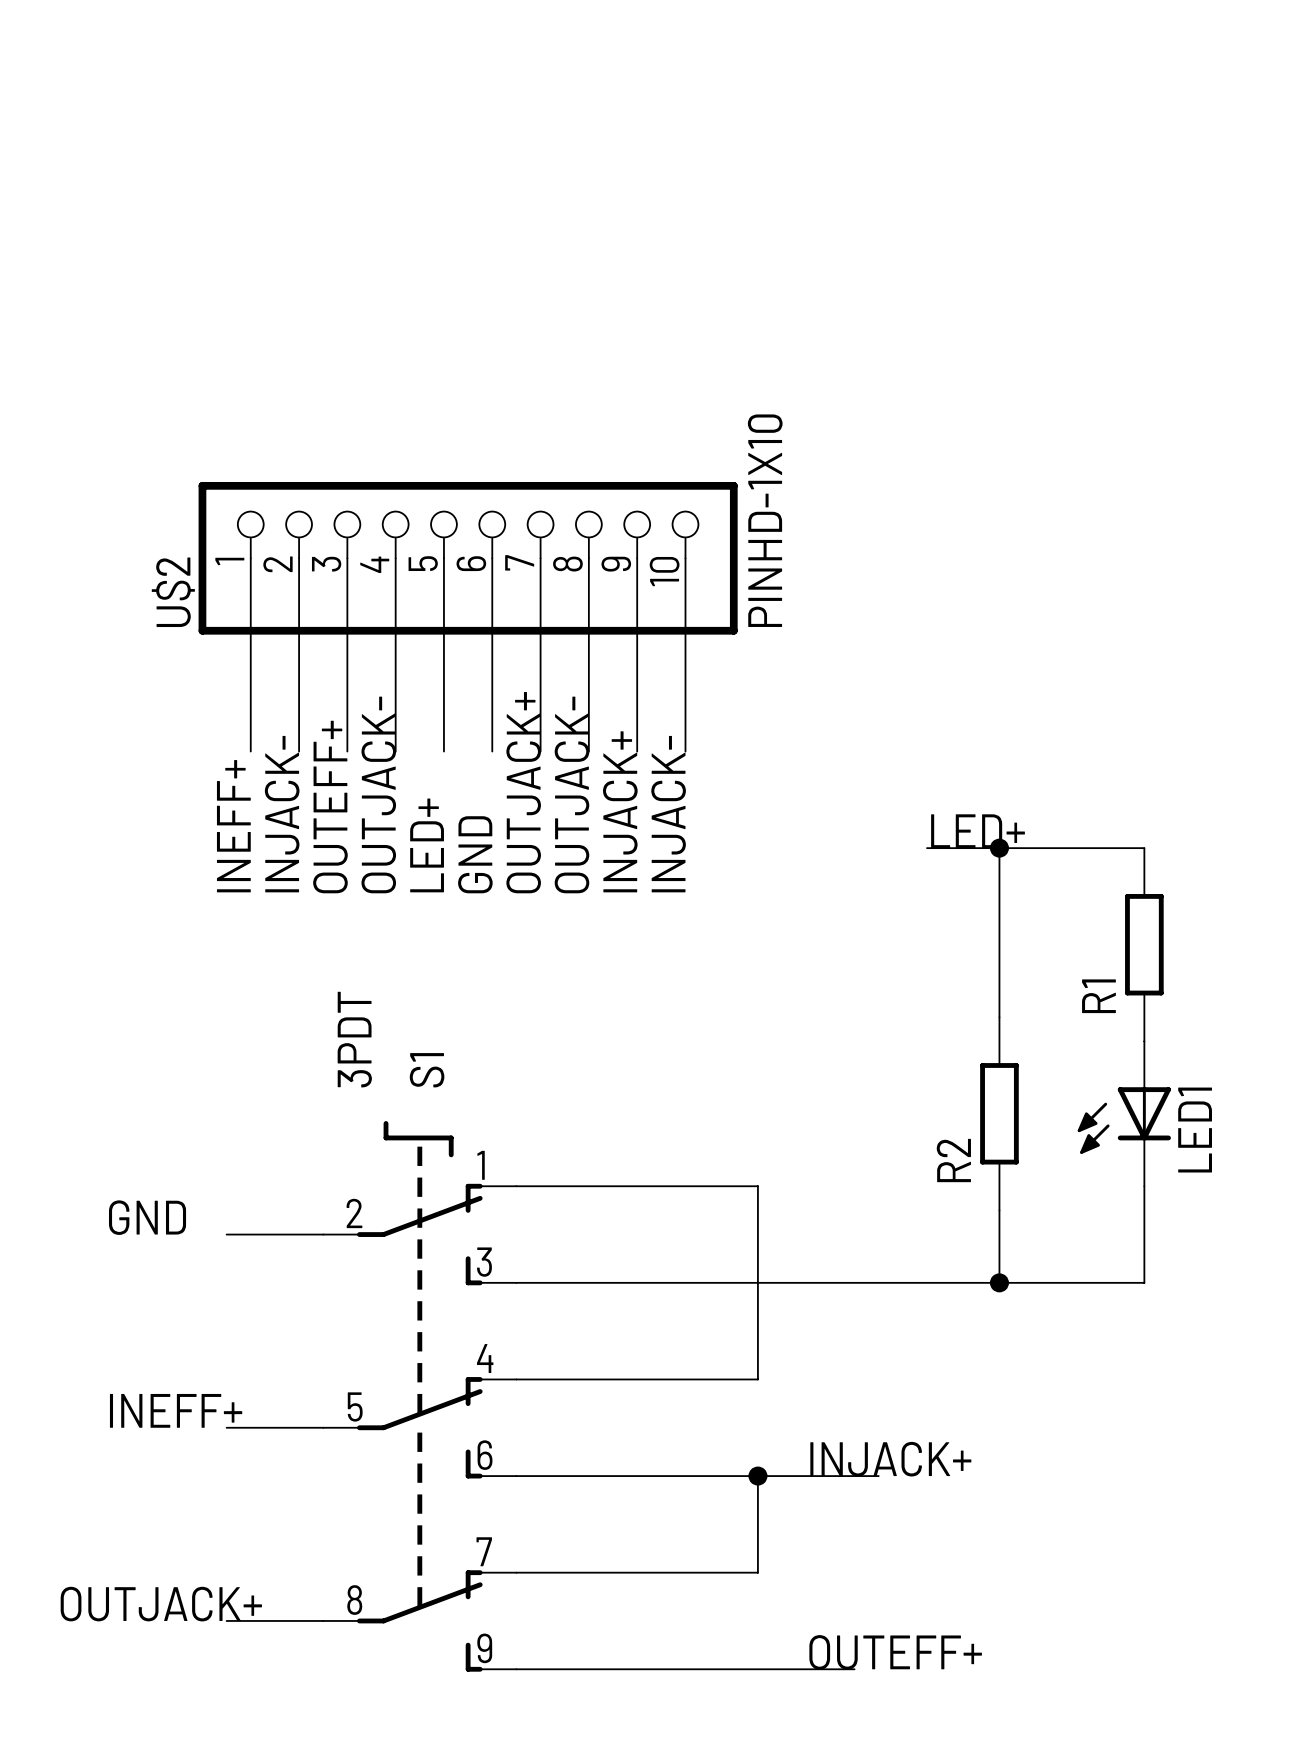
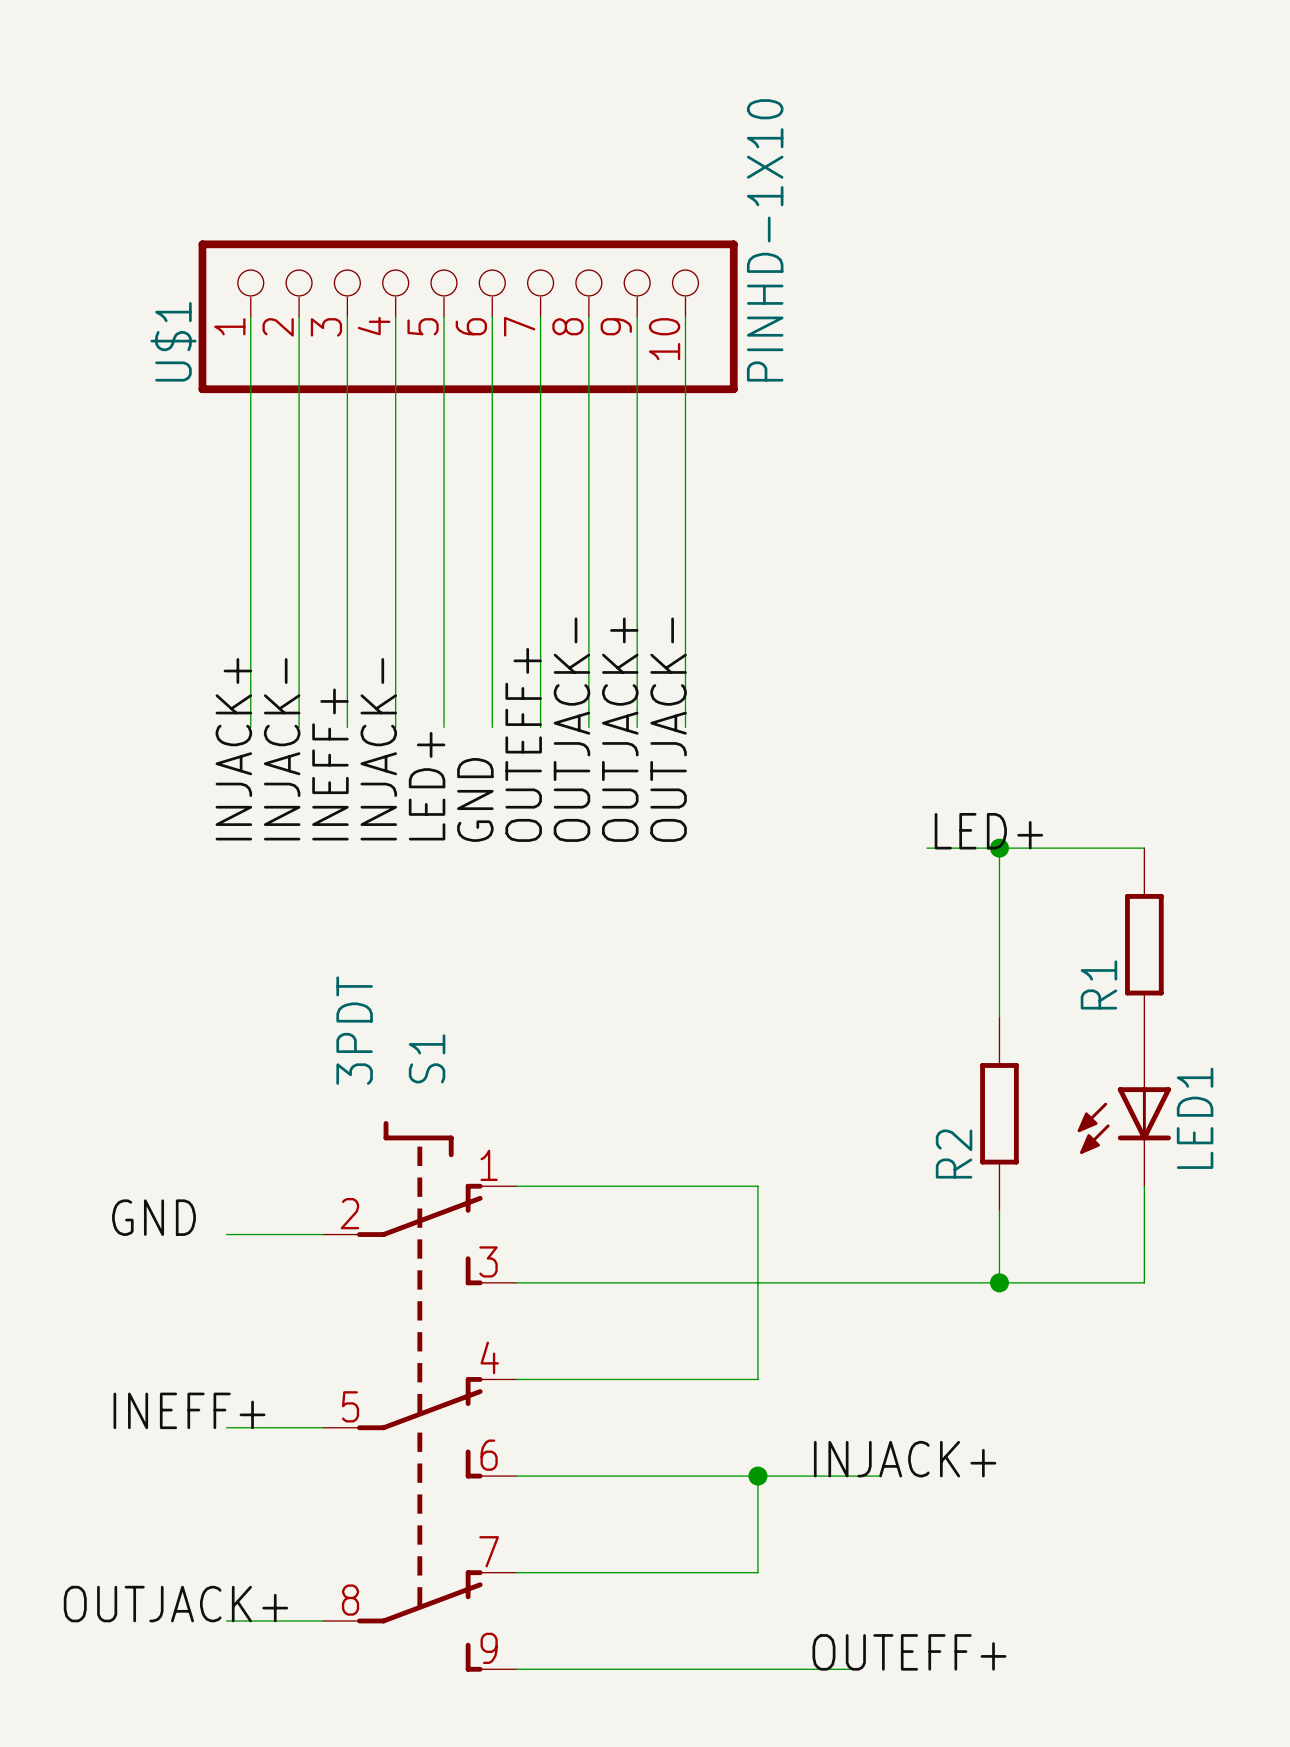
wire: none -> (250, 316) (250, 558)
wire: none -> (299, 316) (299, 558)
wire: none -> (347, 316) (347, 558)
wire: none -> (395, 316) (395, 558)
wire: none -> (443, 316) (443, 558)
U$1: none -> PINHD-1X10 (468, 316)
wire: none -> (492, 316) (492, 558)
wire: none -> (540, 316) (540, 558)
wire: none -> (588, 316) (588, 558)
wire: none -> (637, 316) (637, 558)
wire: none -> (685, 316) (685, 558)
U$2: PINHD-1X10 (468, 558) -> none
wire: (250, 727) (250, 751) -> none
wire: (299, 727) (299, 751) -> none
wire: (347, 727) (347, 751) -> none
wire: (395, 727) (395, 751) -> none
wire: (443, 727) (443, 751) -> none
wire: (492, 727) (492, 751) -> none
wire: (540, 727) (540, 751) -> none
wire: (588, 727) (588, 751) -> none
wire: (637, 727) (637, 751) -> none
wire: (685, 727) (685, 751) -> none
label position: OUTJACK+ (523, 792) -> OUTJACK+ (620, 729)
label: OUTJACK- (378, 794) -> INJACK- (378, 749)
label position: OUTJACK- (572, 794) -> OUTJACK- (571, 729)
label position: OUTEFF+ (330, 807) -> OUTEFF+ (523, 744)
label position: INJACK+ (620, 811) -> INJACK+ (233, 749)
label position: INJACK- (282, 814) -> INJACK- (282, 749)
label: INJACK- (668, 814) -> OUTJACK- (668, 729)
label position: INEFF+ (233, 826) -> INEFF+ (330, 764)
label position: LED+ (427, 845) -> LED+ (427, 786)
label position: GND (475, 854) -> GND (475, 799)

